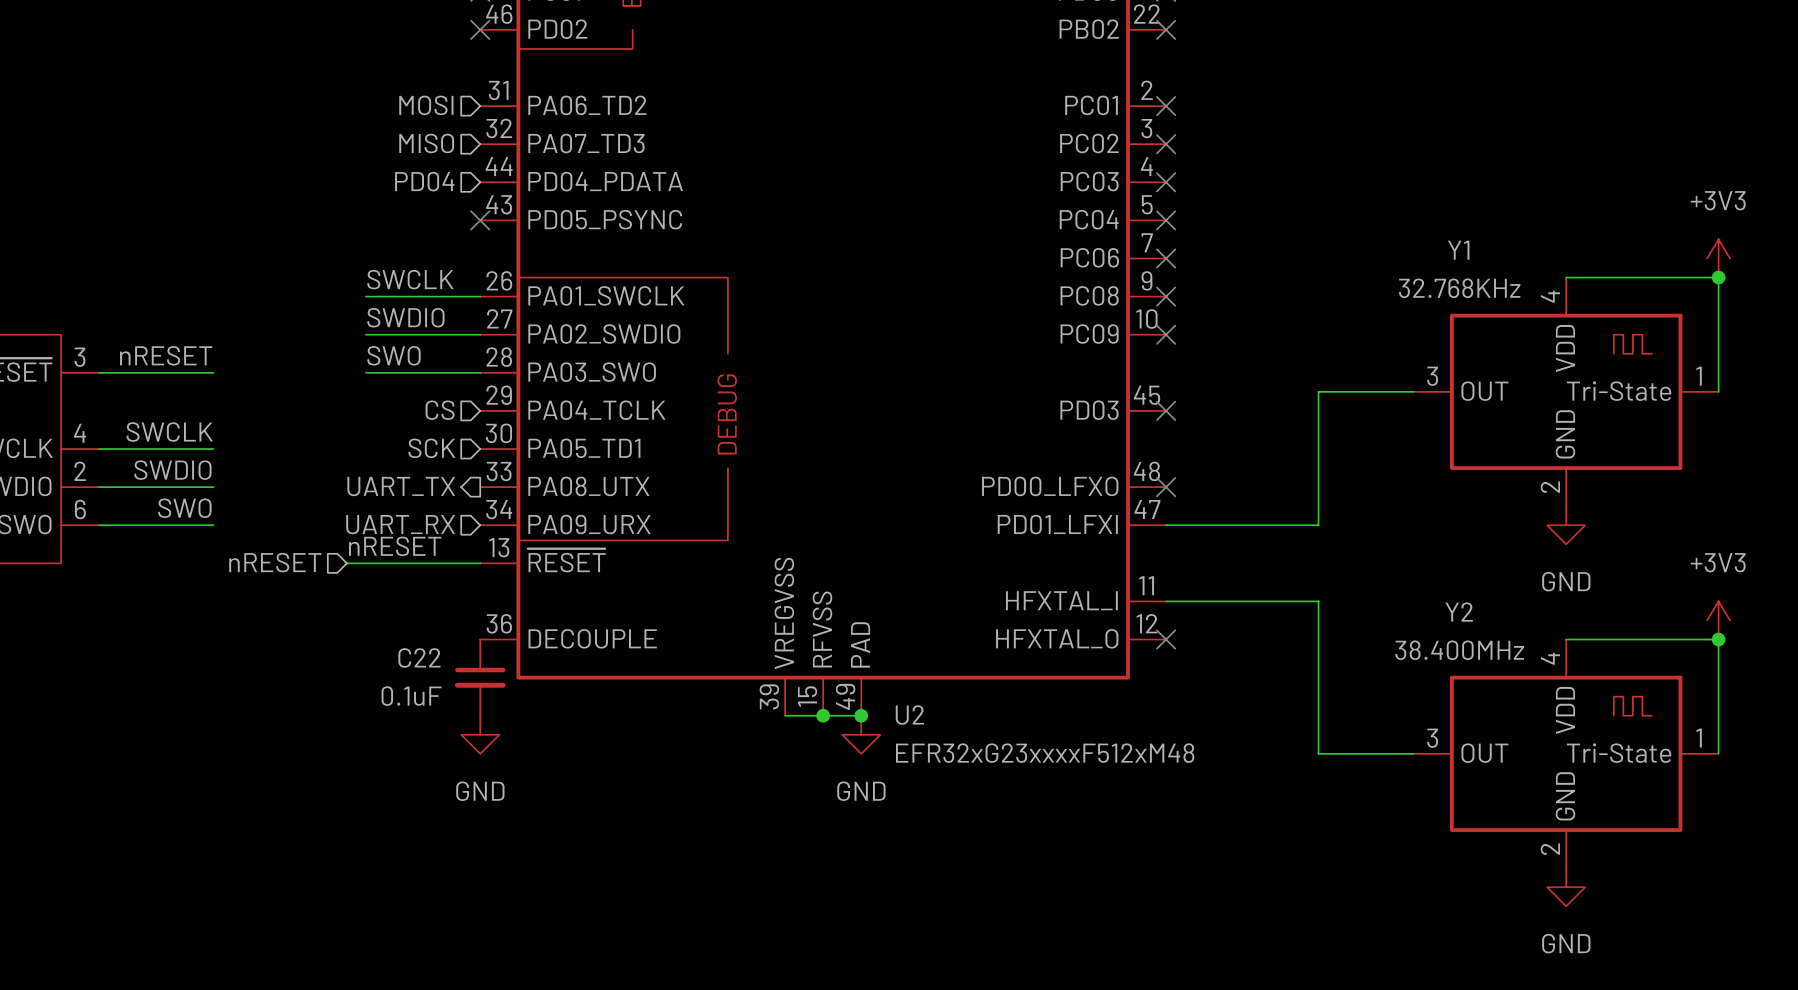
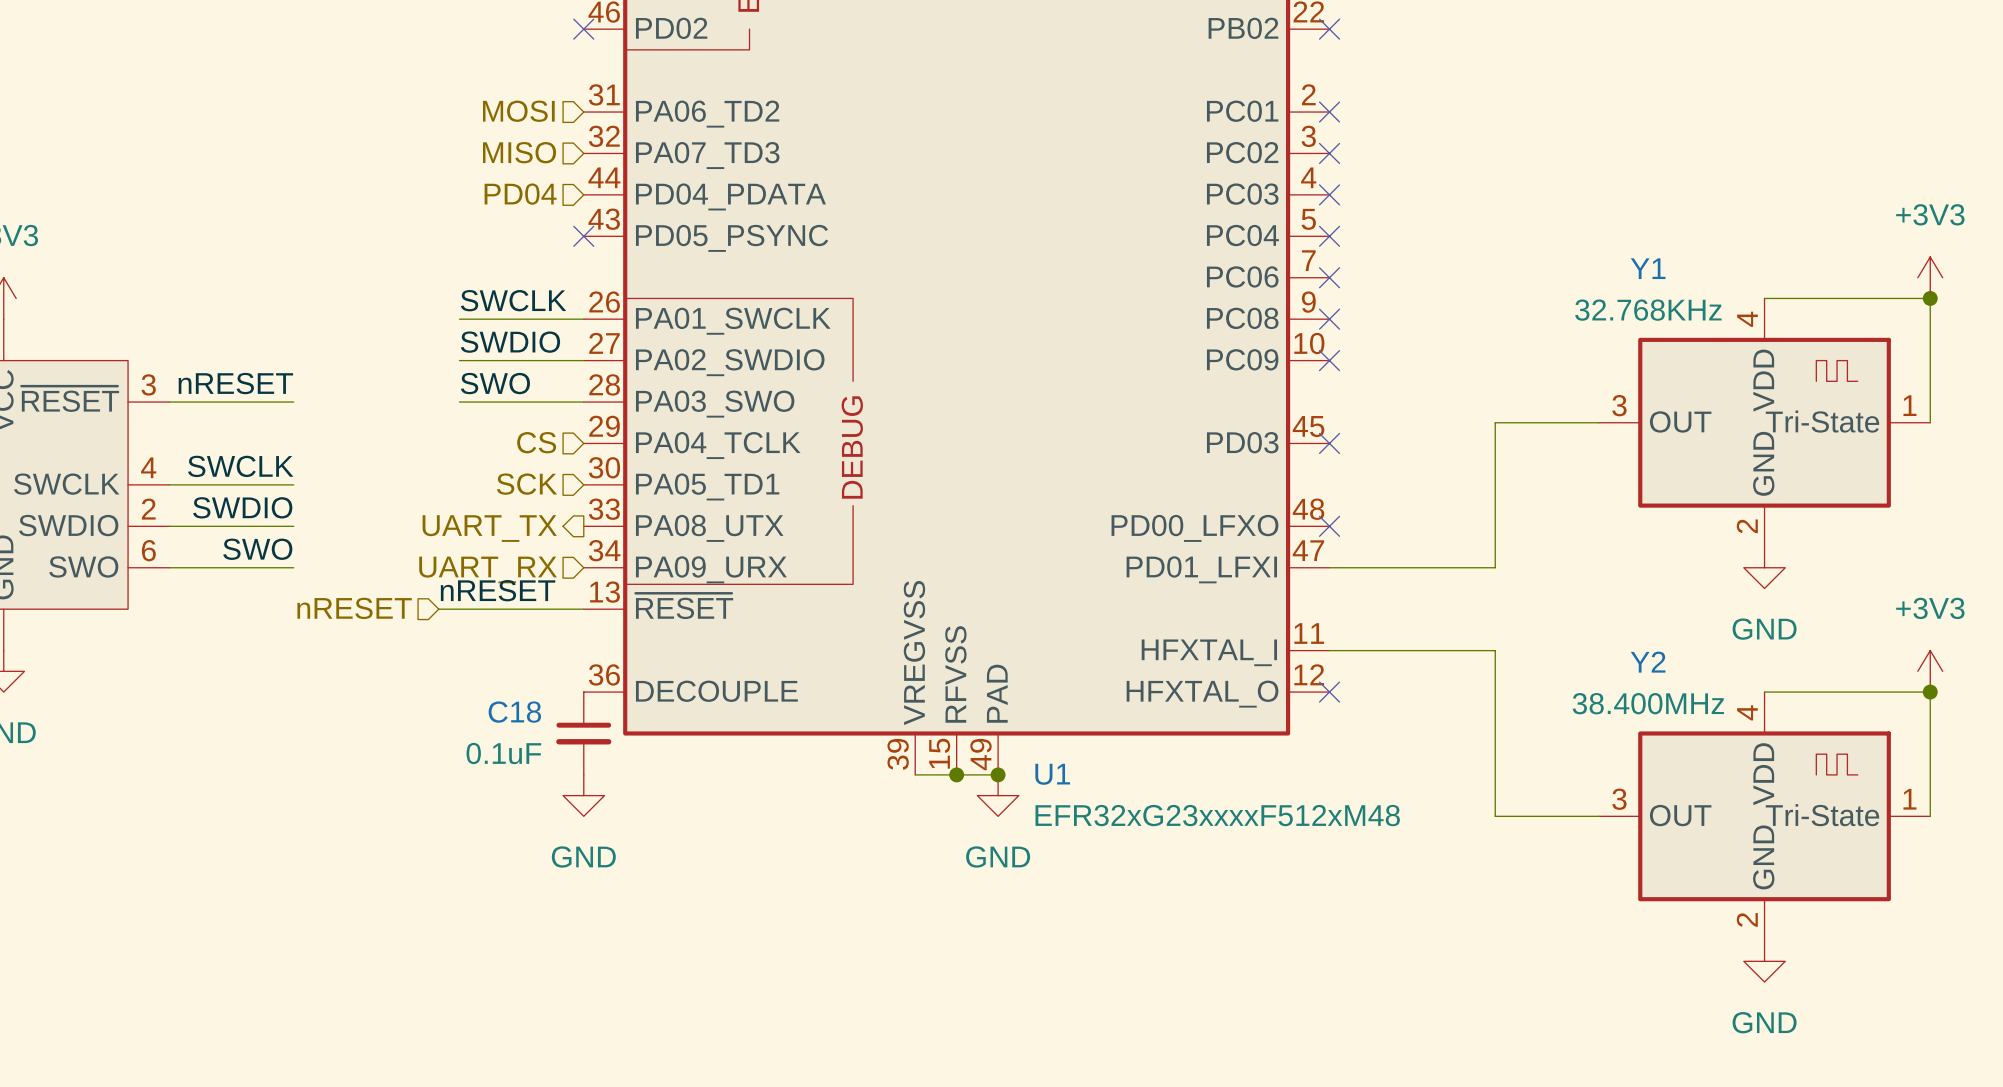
C22 name: C22 (419, 657) -> C18 (514, 712)
U2 name: U2 (909, 715) -> U1 (1052, 774)

